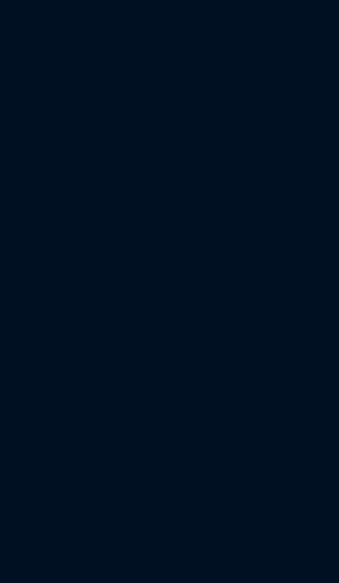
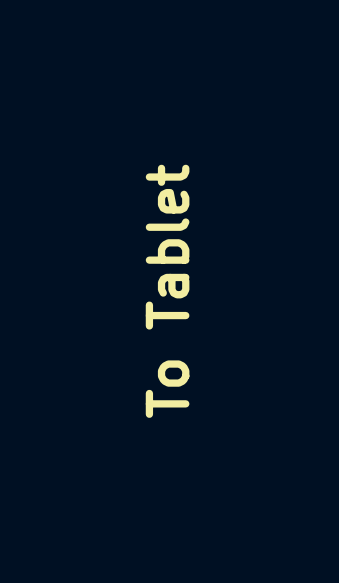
text: none -> To Tablet (167, 291)

